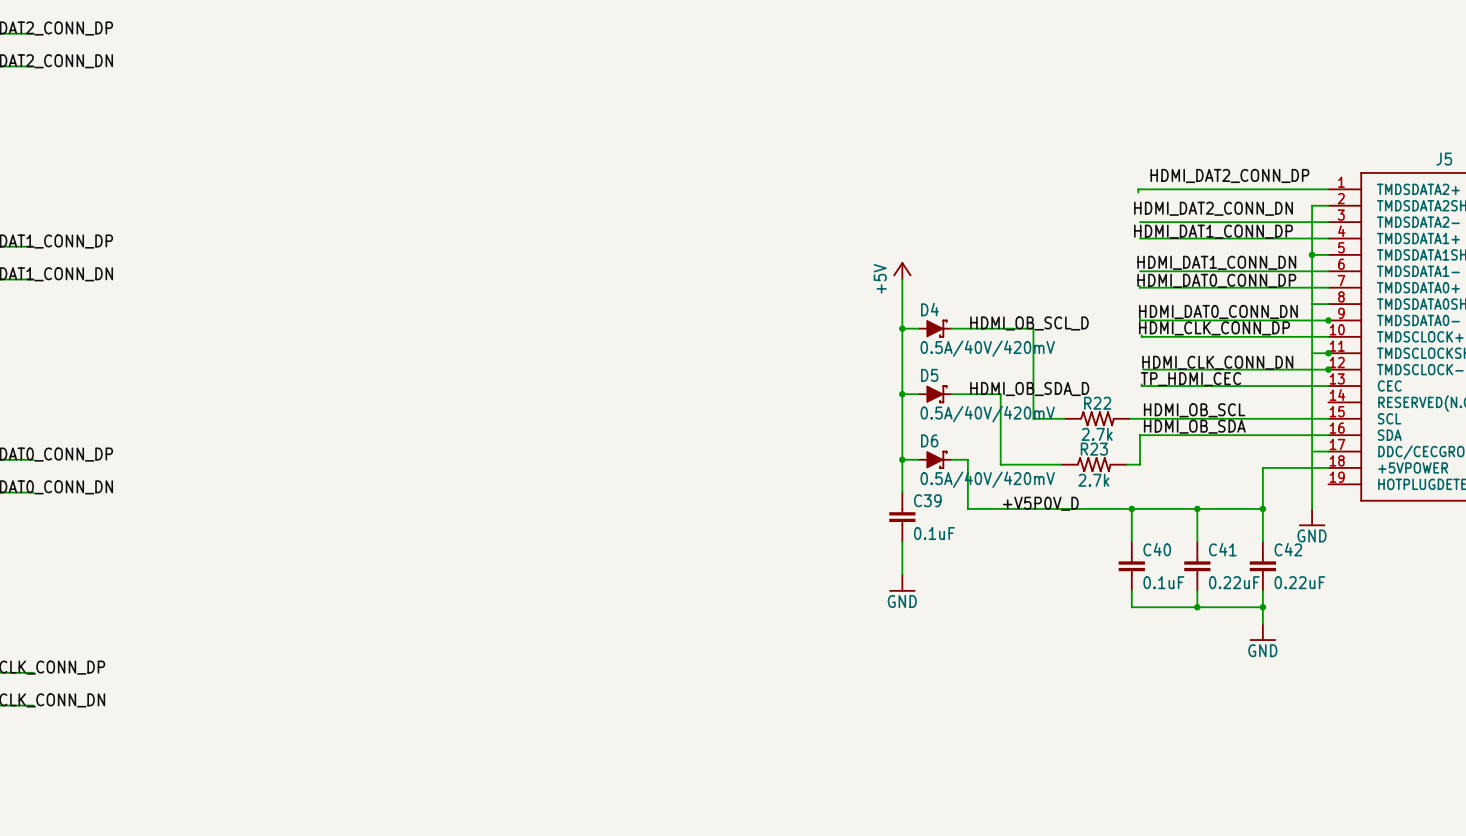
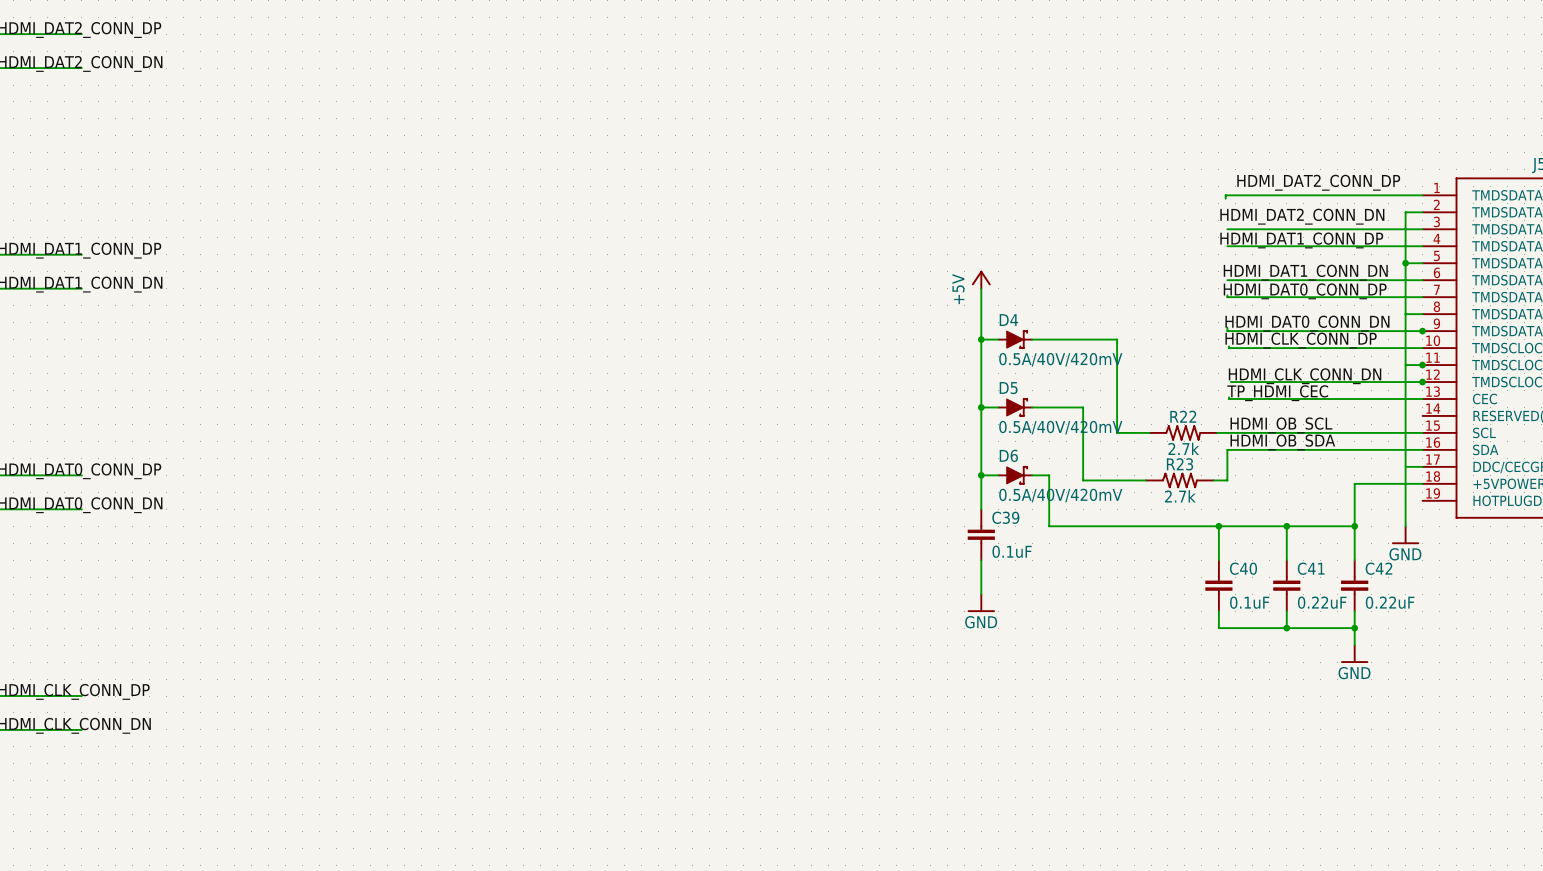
label: HDMI_OB_SCL_D (1029, 323) -> none
label: HDMI_OB_SDA_D (1029, 389) -> none
label: +V5P0V_D (1040, 503) -> none

